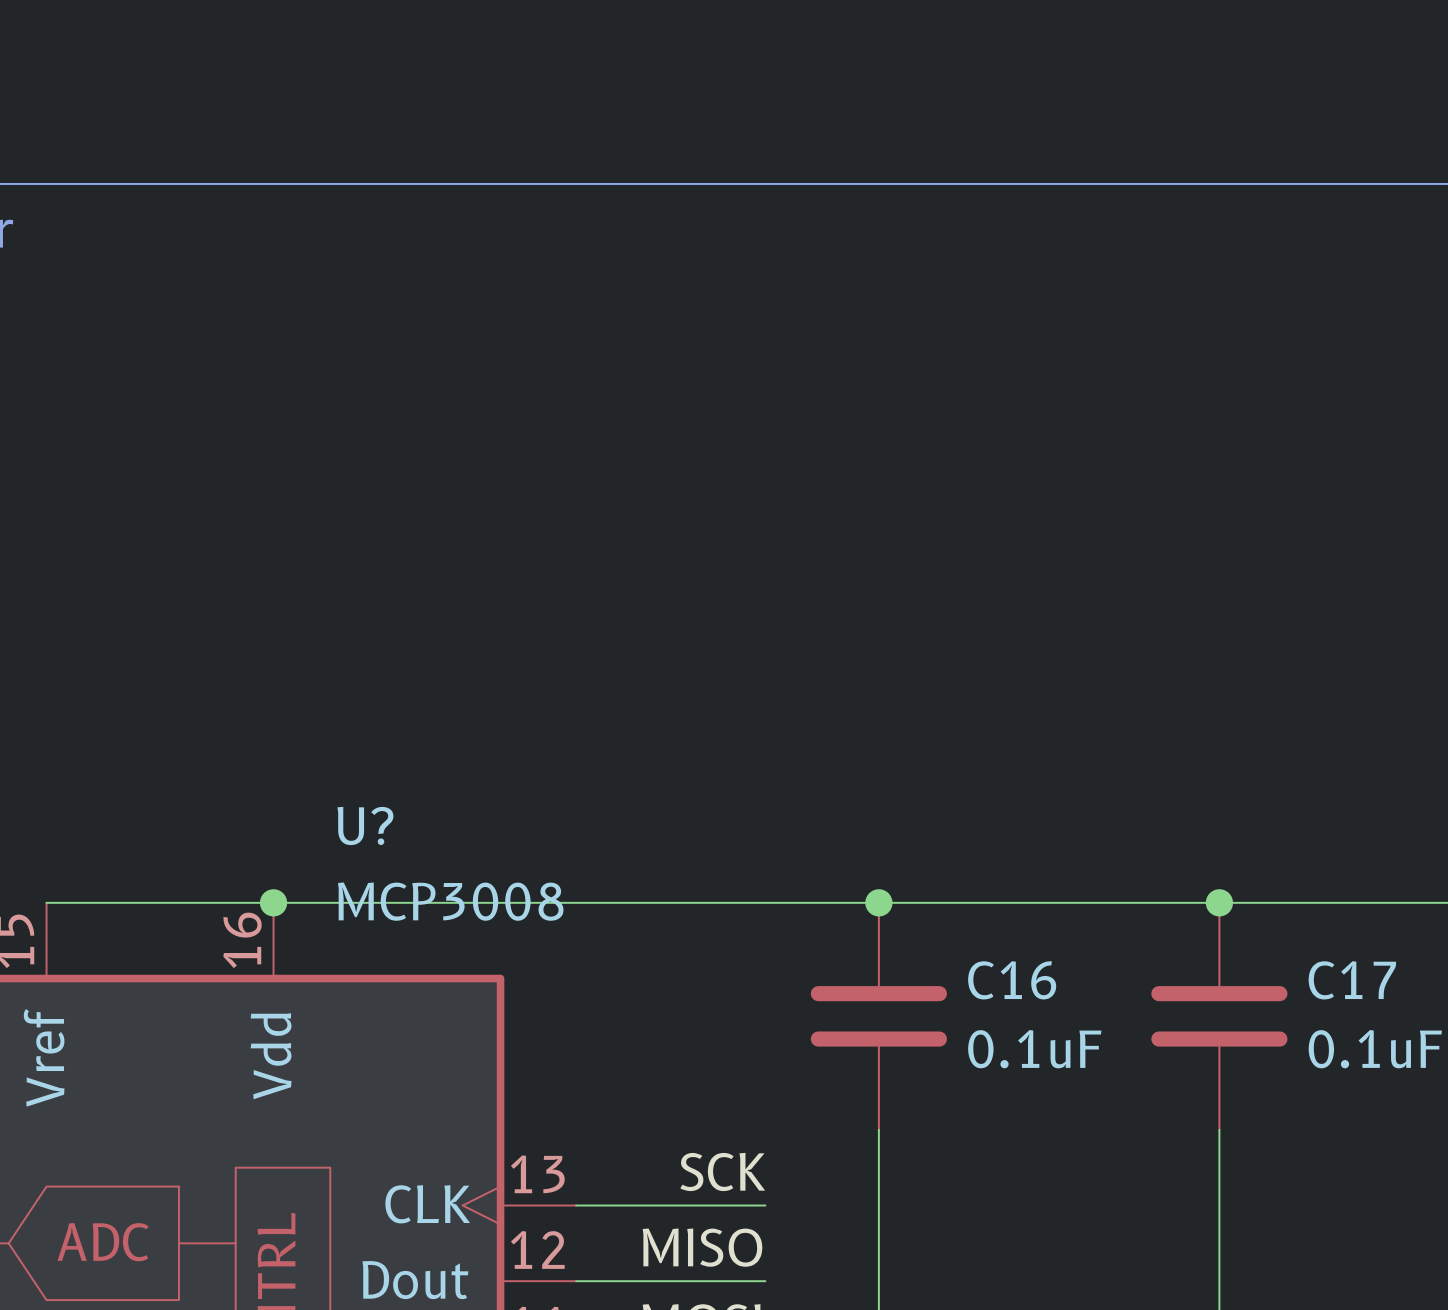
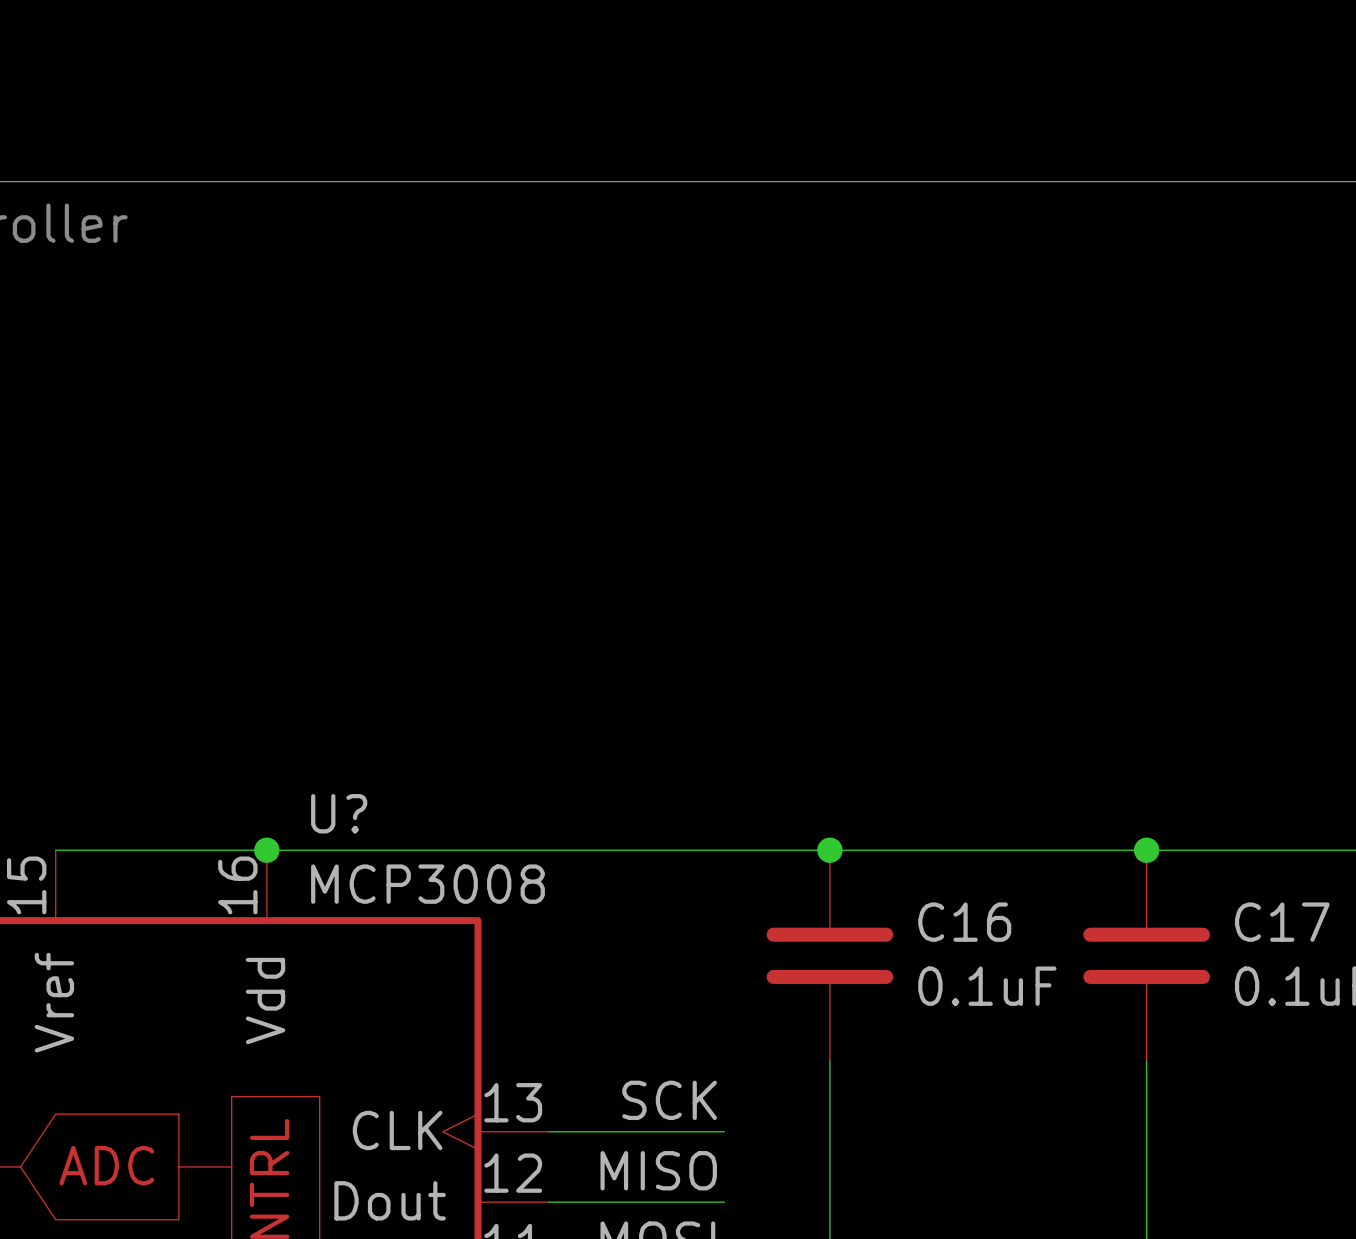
U? name position: U? (365, 825) -> U? (339, 813)
U? value position: MCP3008 (450, 901) -> MCP3008 (428, 884)

